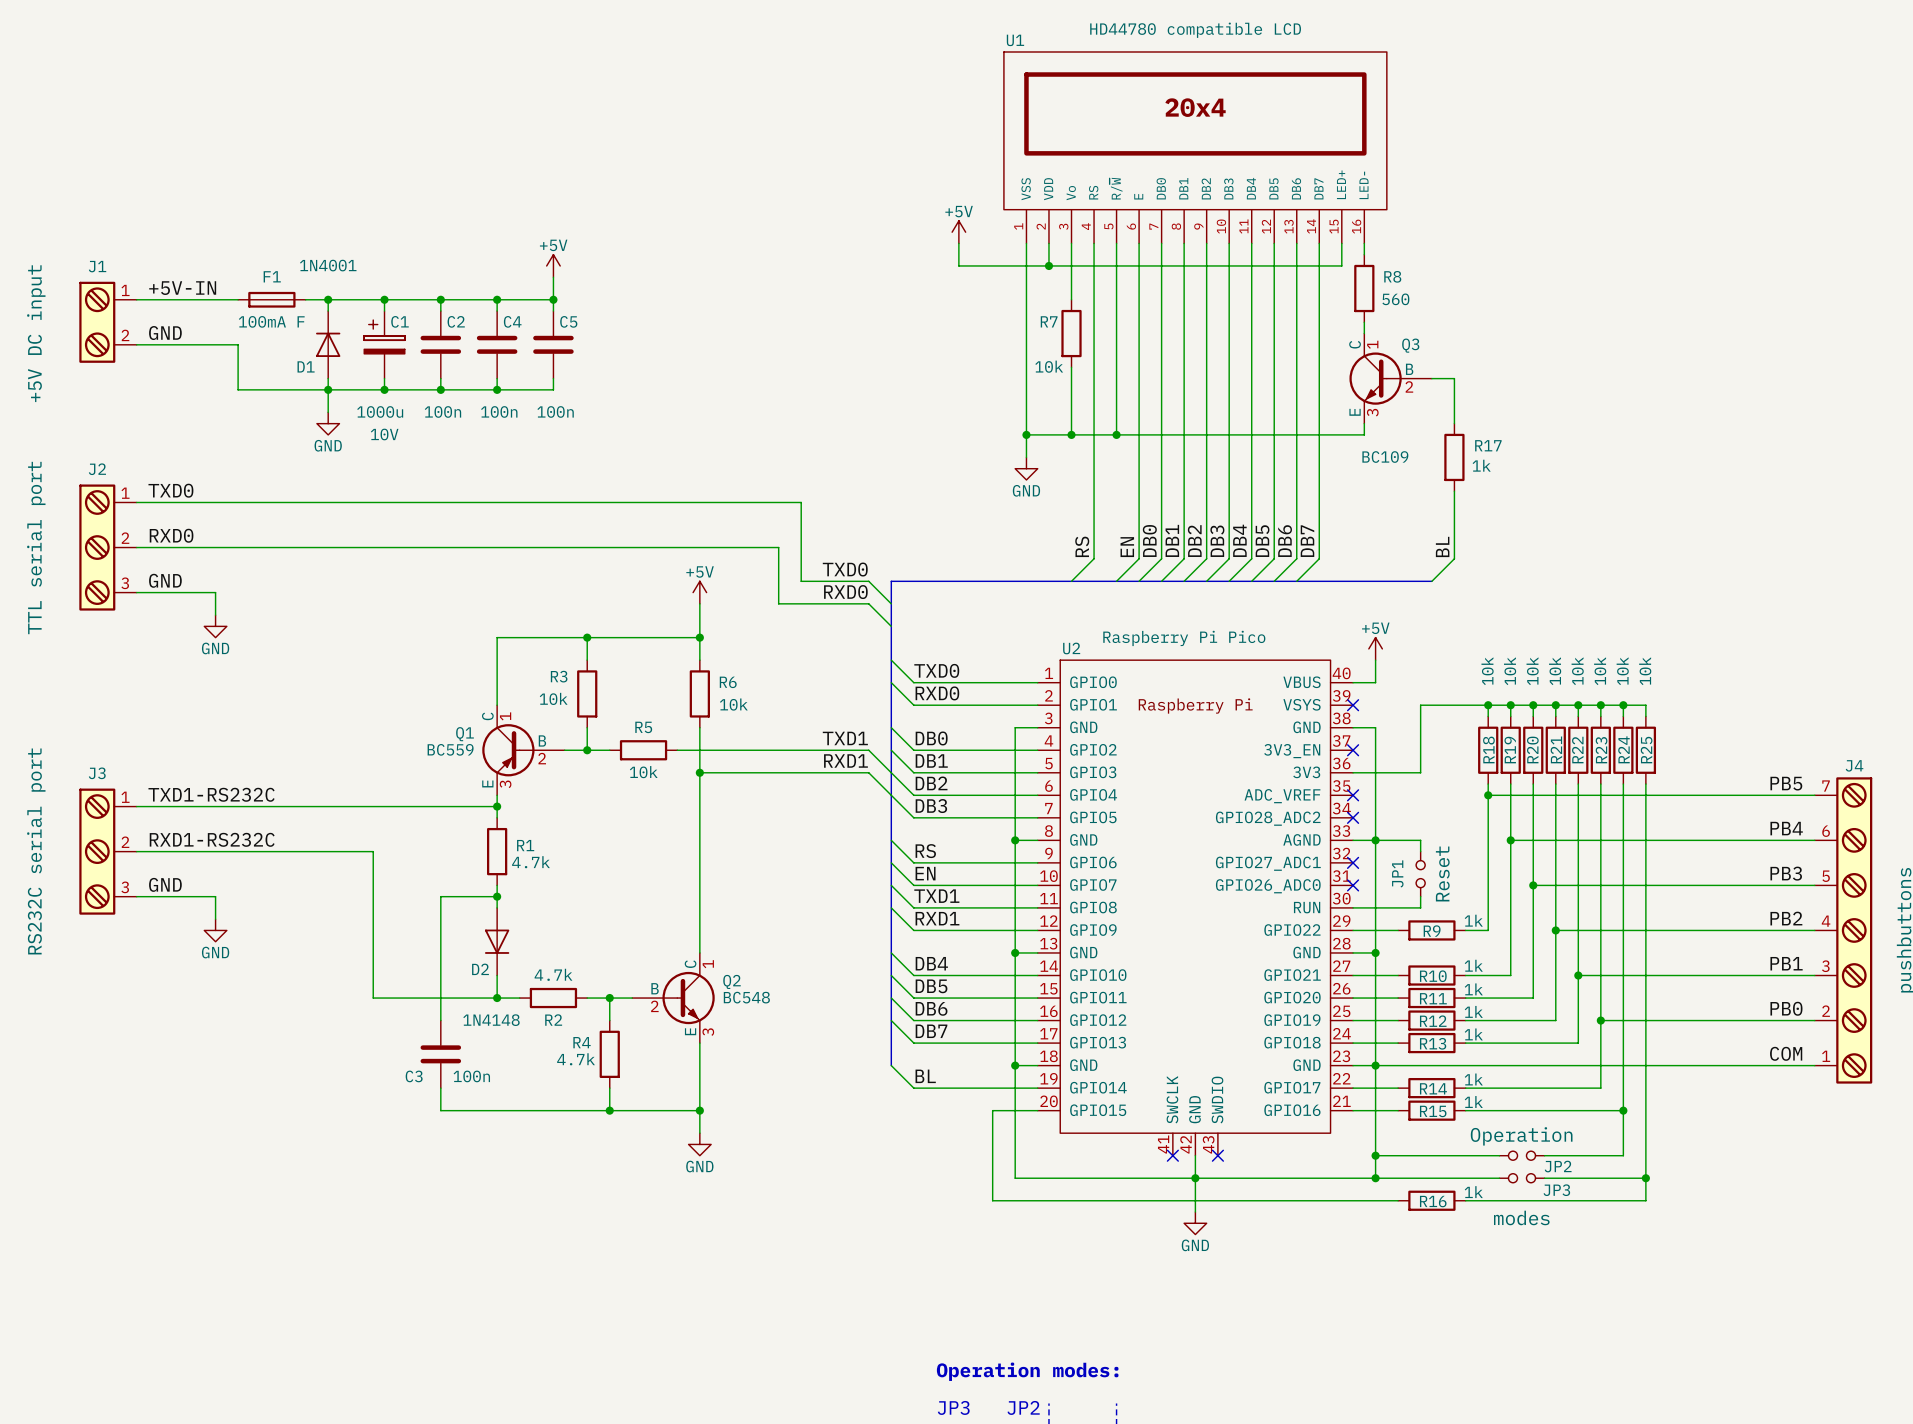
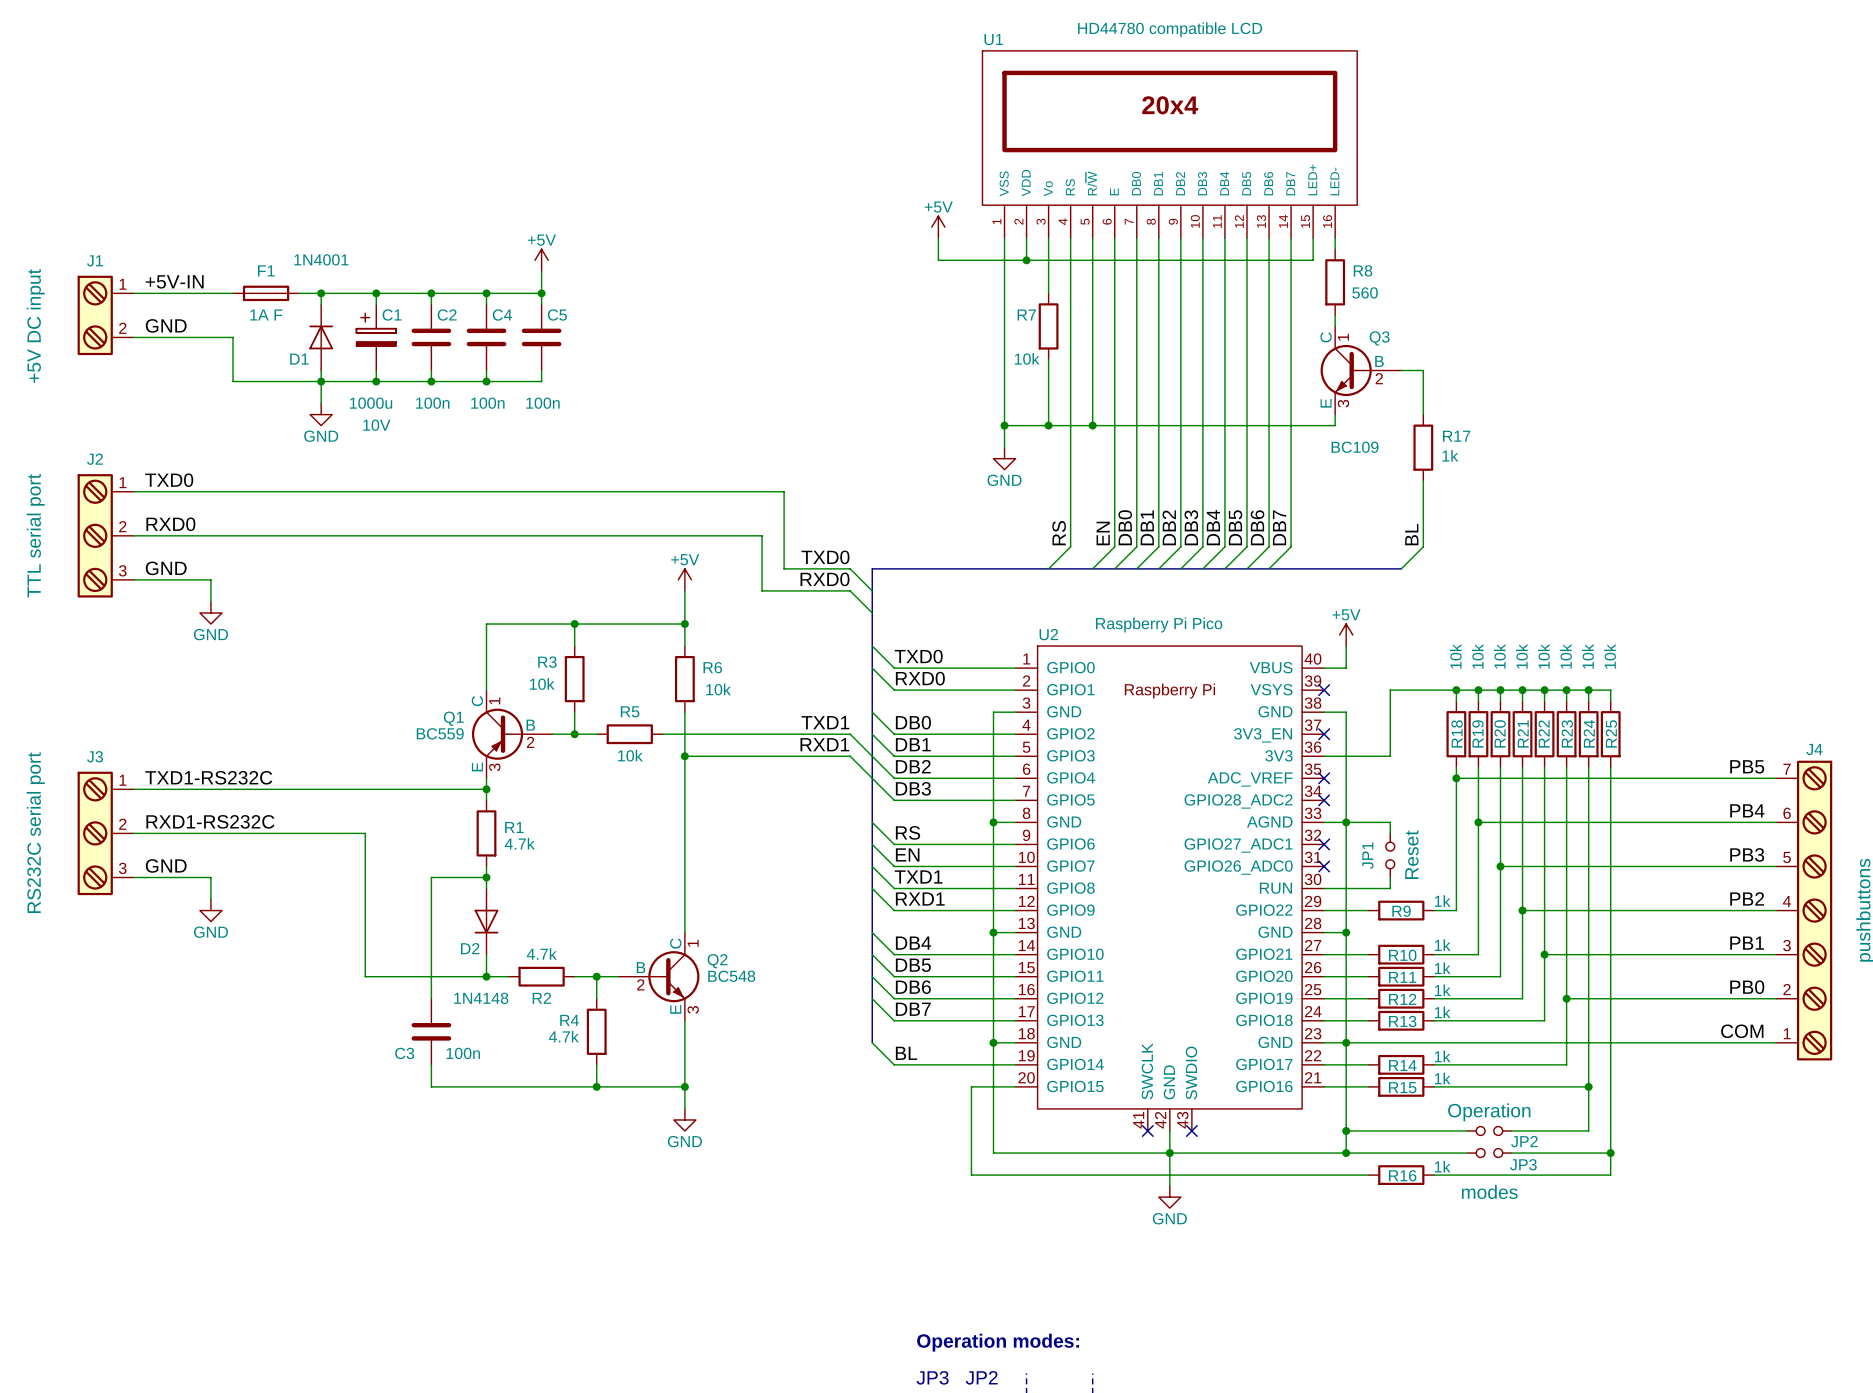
F1 value: 100mA F (271, 321) -> 1A F (266, 314)

